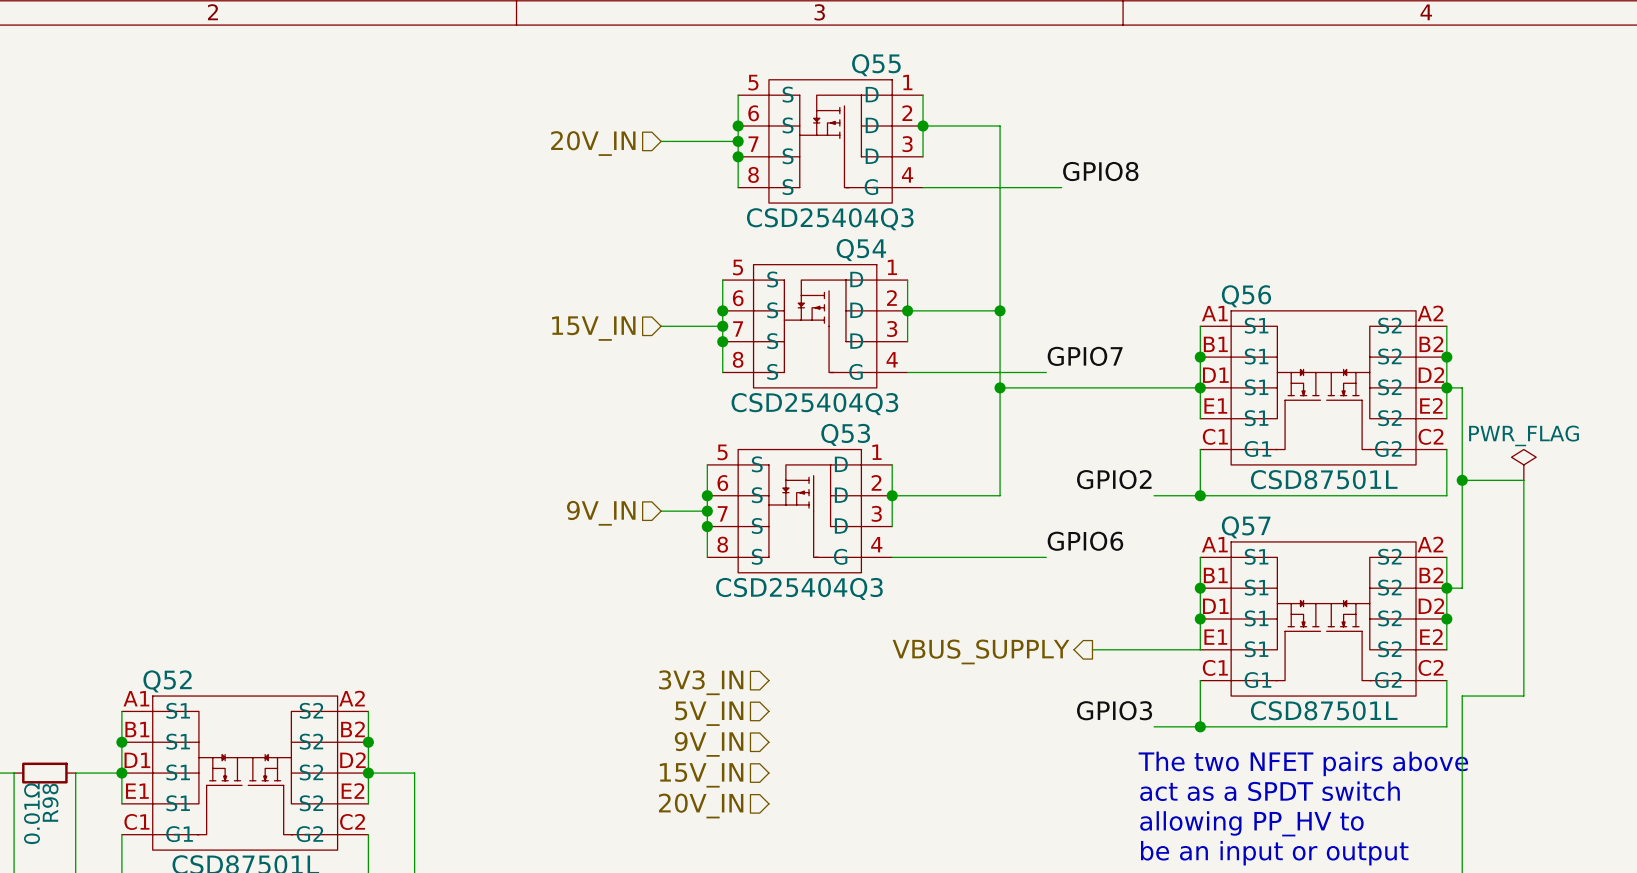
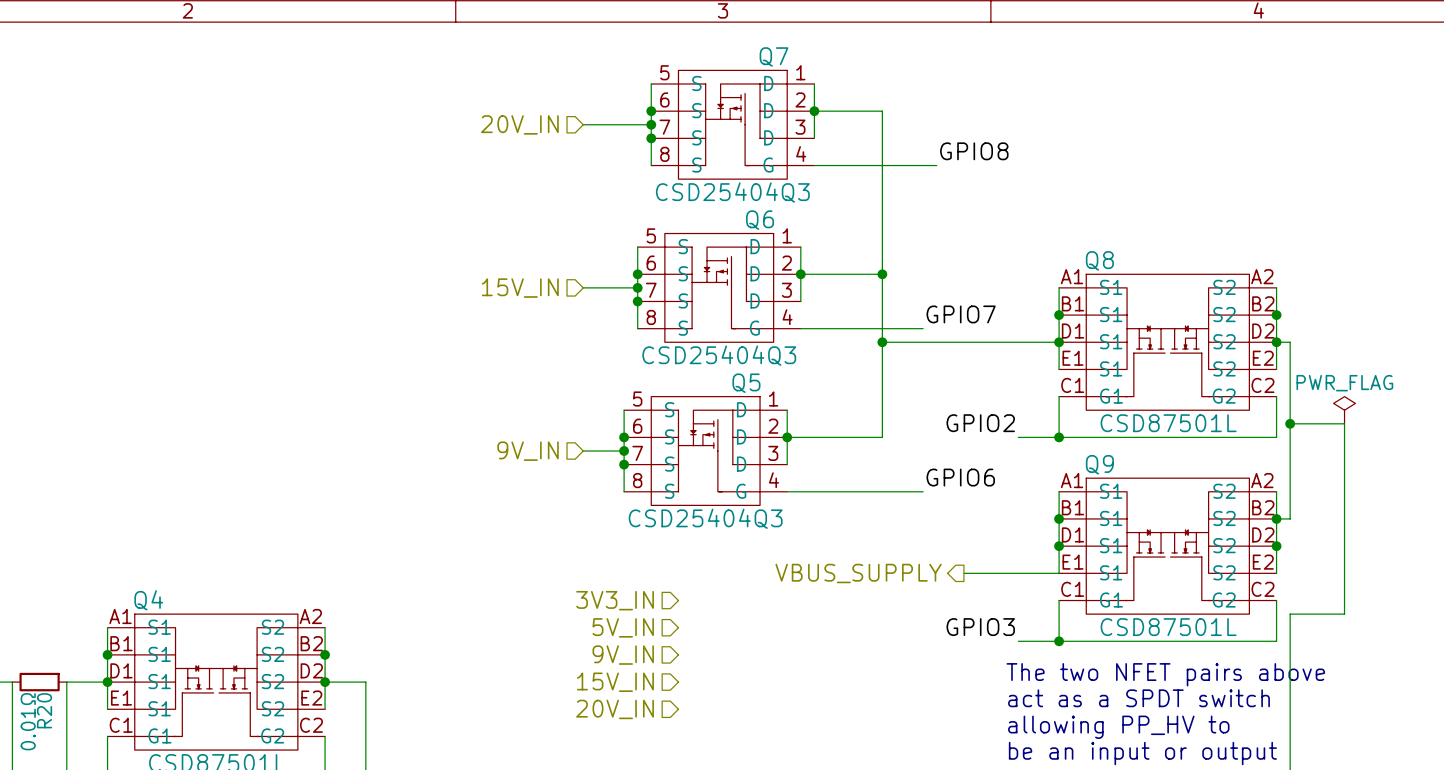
Q55 name: Q55 (876, 65) -> Q7 (774, 56)
Q54 name: Q54 (861, 250) -> Q6 (760, 220)
Q56 name: Q56 (1246, 296) -> Q8 (1099, 260)
Q53 name: Q53 (845, 434) -> Q5 (746, 383)
Q57 name: Q57 (1246, 527) -> Q9 (1099, 464)
Q52 name: Q52 (167, 681) -> Q4 (148, 600)
R98 name: R98 (50, 802) -> R20 (44, 710)

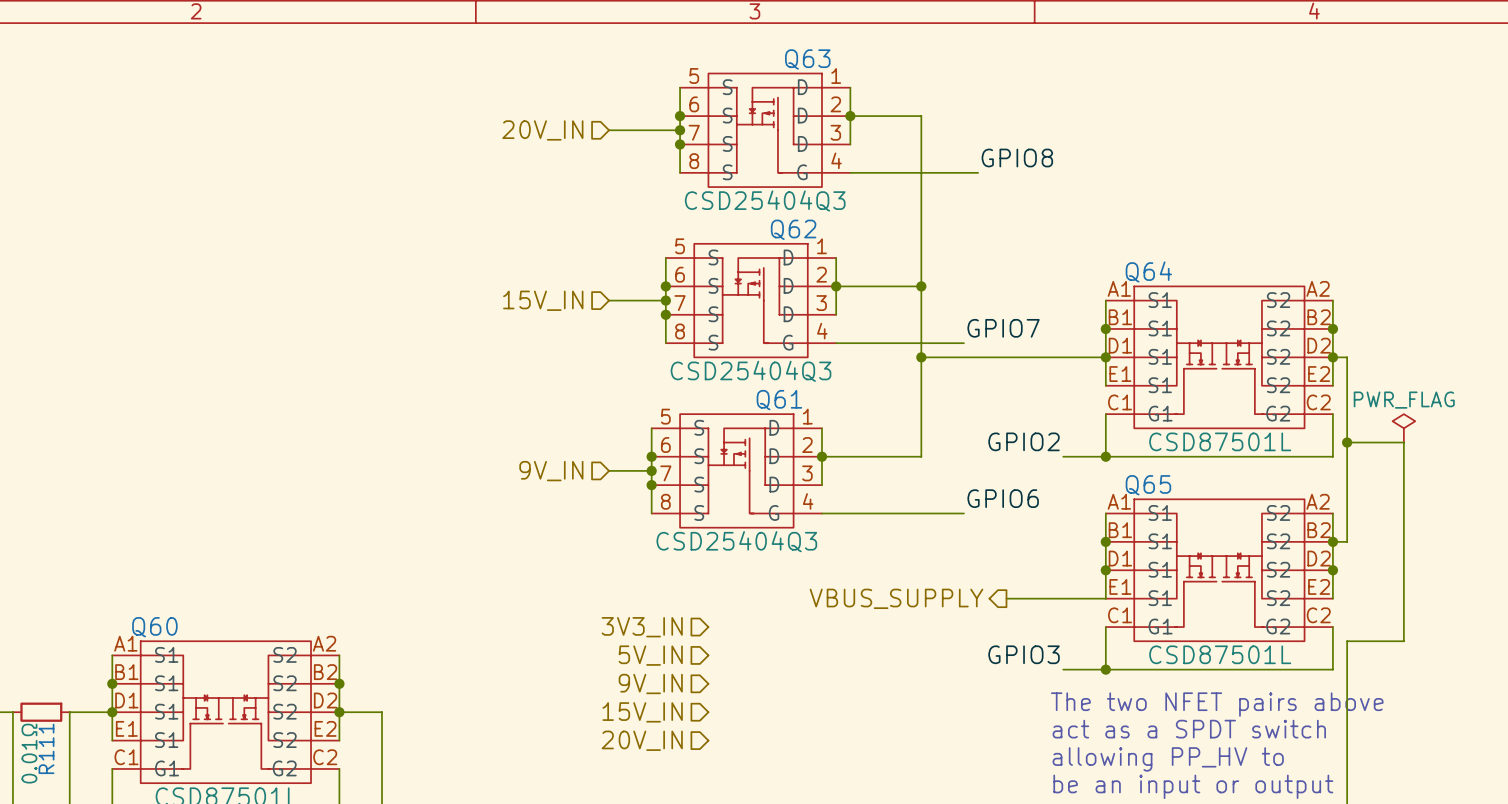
Q7 name: Q7 (774, 56) -> Q63 (807, 59)
Q6 name: Q6 (760, 220) -> Q62 (793, 229)
Q8 name: Q8 (1099, 260) -> Q64 (1148, 271)
Q5 name: Q5 (746, 383) -> Q61 (779, 400)
Q9 name: Q9 (1099, 464) -> Q65 (1148, 485)
Q4 name: Q4 (148, 600) -> Q60 (154, 627)
R20 name: R20 (44, 710) -> R111 (46, 748)

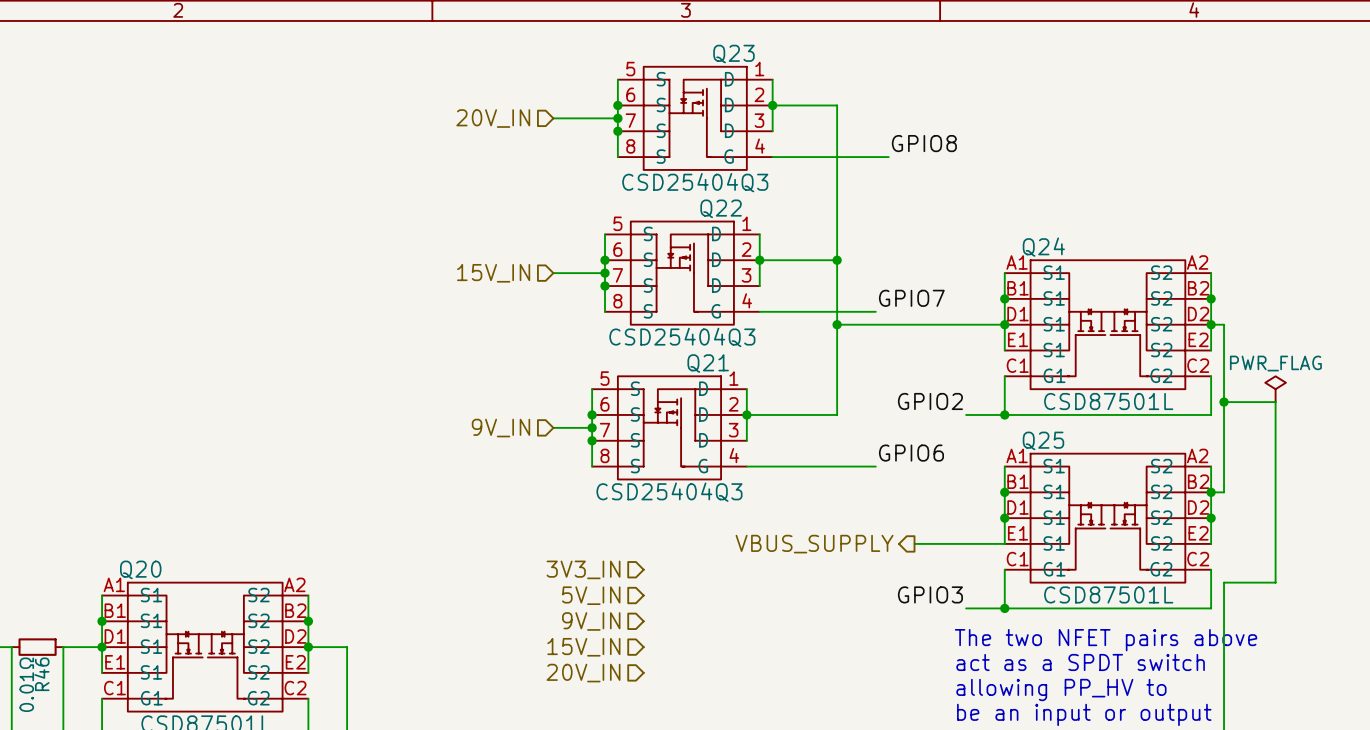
Q63 name: Q63 (807, 59) -> Q23 (733, 54)
Q62 name: Q62 (793, 229) -> Q22 (721, 208)
Q64 name: Q64 (1148, 271) -> Q24 (1043, 247)
Q61 name: Q61 (779, 400) -> Q21 (708, 363)
Q65 name: Q65 (1148, 485) -> Q25 (1043, 440)
Q60 name: Q60 (154, 627) -> Q20 (140, 569)
R111 name: R111 (46, 748) -> R46 (41, 674)

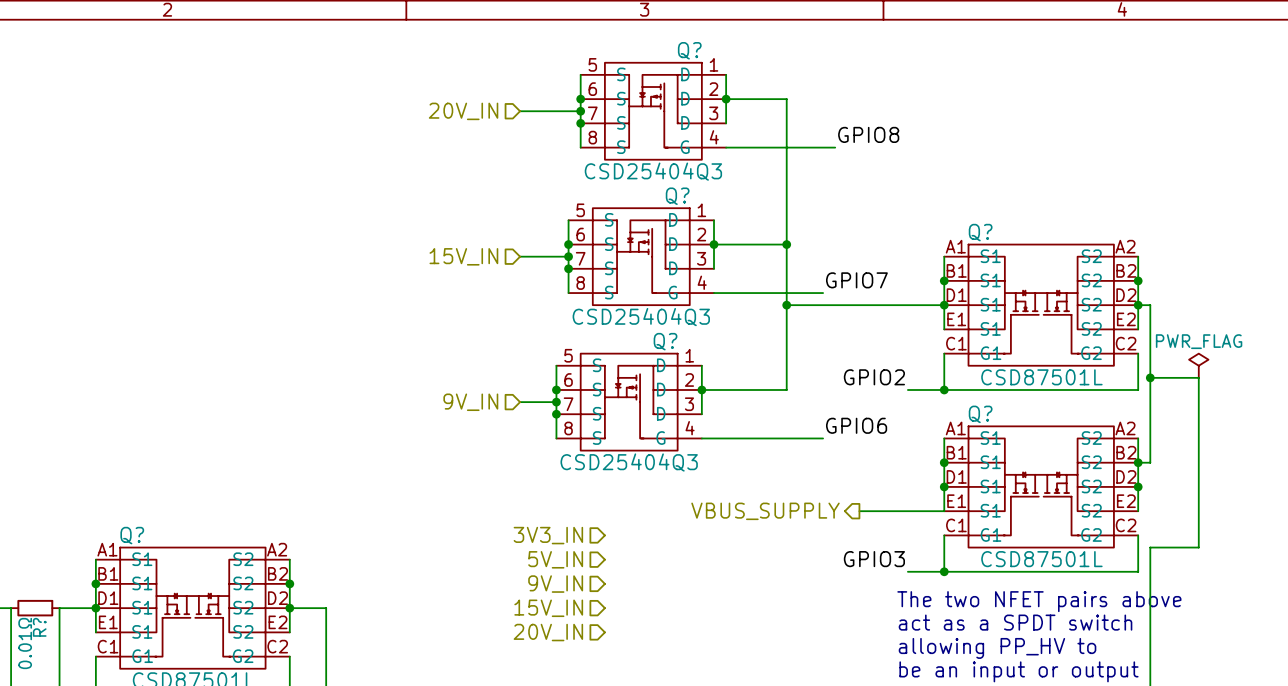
Q23 name: Q23 (733, 54) -> Q? (689, 50)
Q22 name: Q22 (721, 208) -> Q? (677, 196)
Q24 name: Q24 (1043, 247) -> Q? (980, 232)
Q21 name: Q21 (708, 363) -> Q? (665, 341)
Q25 name: Q25 (1043, 440) -> Q? (980, 414)
Q20 name: Q20 (140, 569) -> Q? (132, 535)
R46 name: R46 (41, 674) -> R? (39, 627)

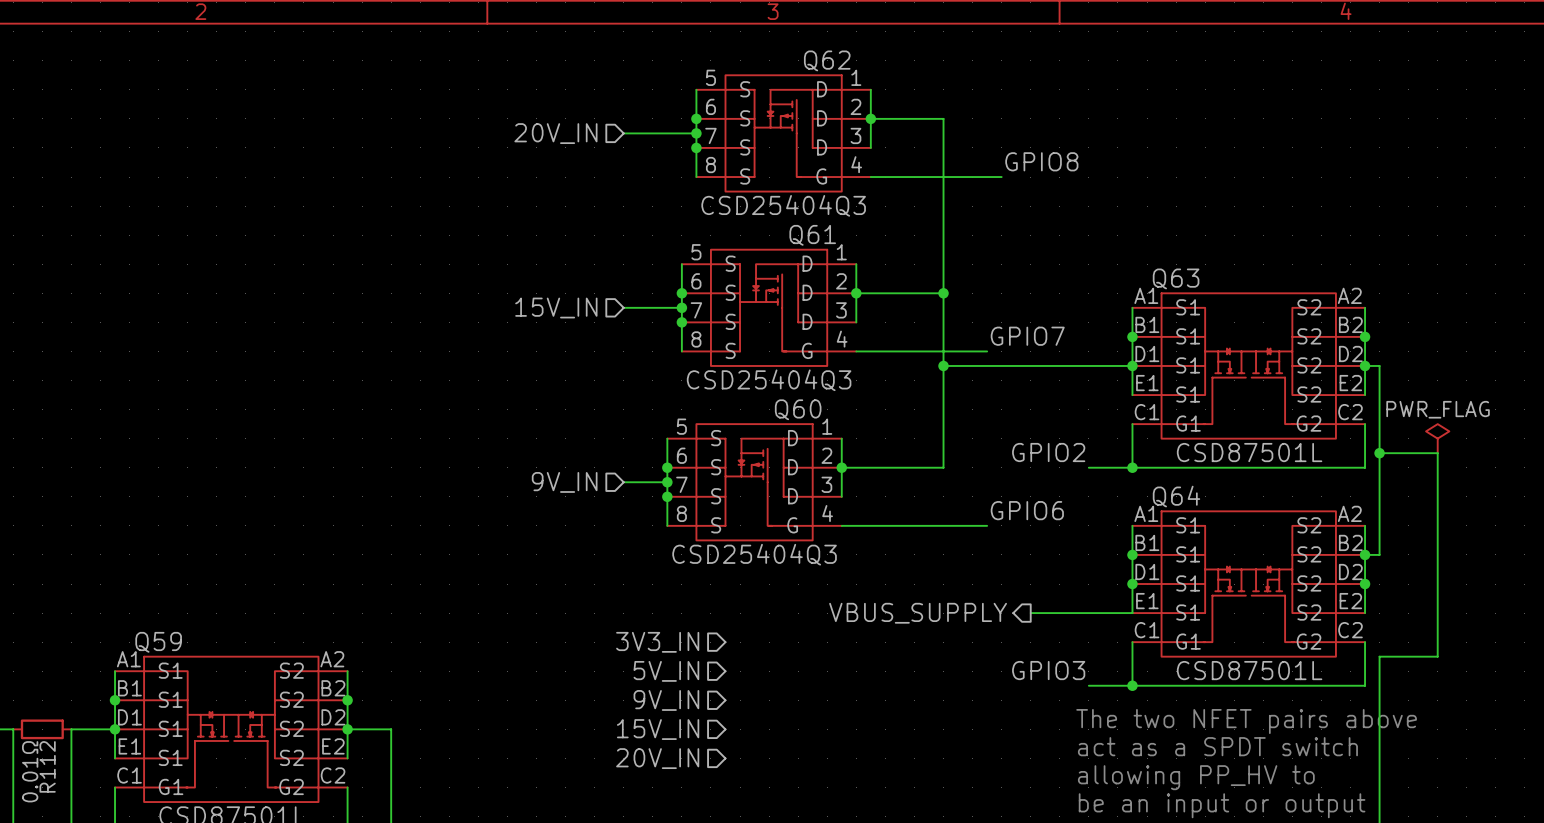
Q? name: Q? (689, 50) -> Q62 (827, 60)
Q? name: Q? (677, 196) -> Q61 (812, 235)
Q? name: Q? (980, 232) -> Q63 (1176, 278)
Q? name: Q? (665, 341) -> Q60 (798, 409)
Q? name: Q? (980, 414) -> Q64 (1176, 496)
Q? name: Q? (132, 535) -> Q59 (158, 642)
R? name: R? (39, 627) -> R112 (47, 766)

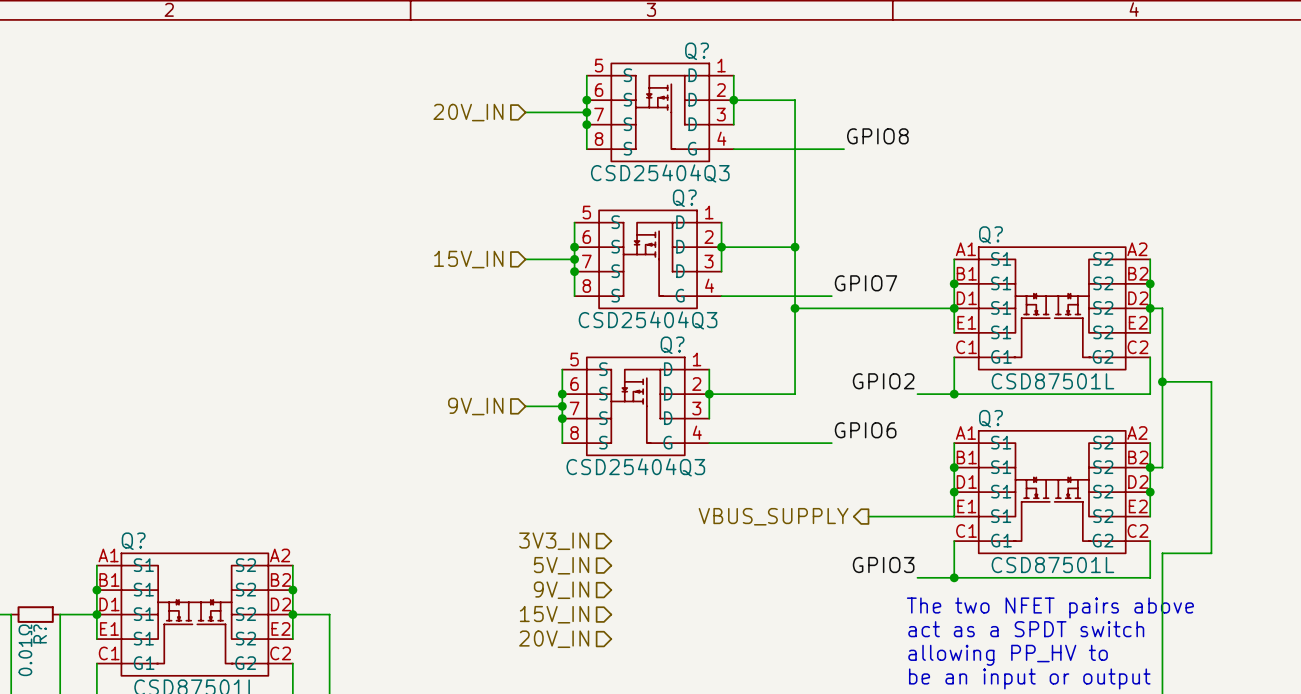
Q62 name: Q62 (827, 60) -> Q? (697, 51)
Q61 name: Q61 (812, 235) -> Q? (684, 198)
Q63 name: Q63 (1176, 278) -> Q? (990, 235)
Q60 name: Q60 (798, 409) -> Q? (672, 345)
power symbol: PWR_FLAG (1437, 438) -> none
Q64 name: Q64 (1176, 496) -> Q? (990, 418)
Q59 name: Q59 (158, 642) -> Q? (133, 541)
R112 name: R112 (47, 766) -> R? (40, 633)

